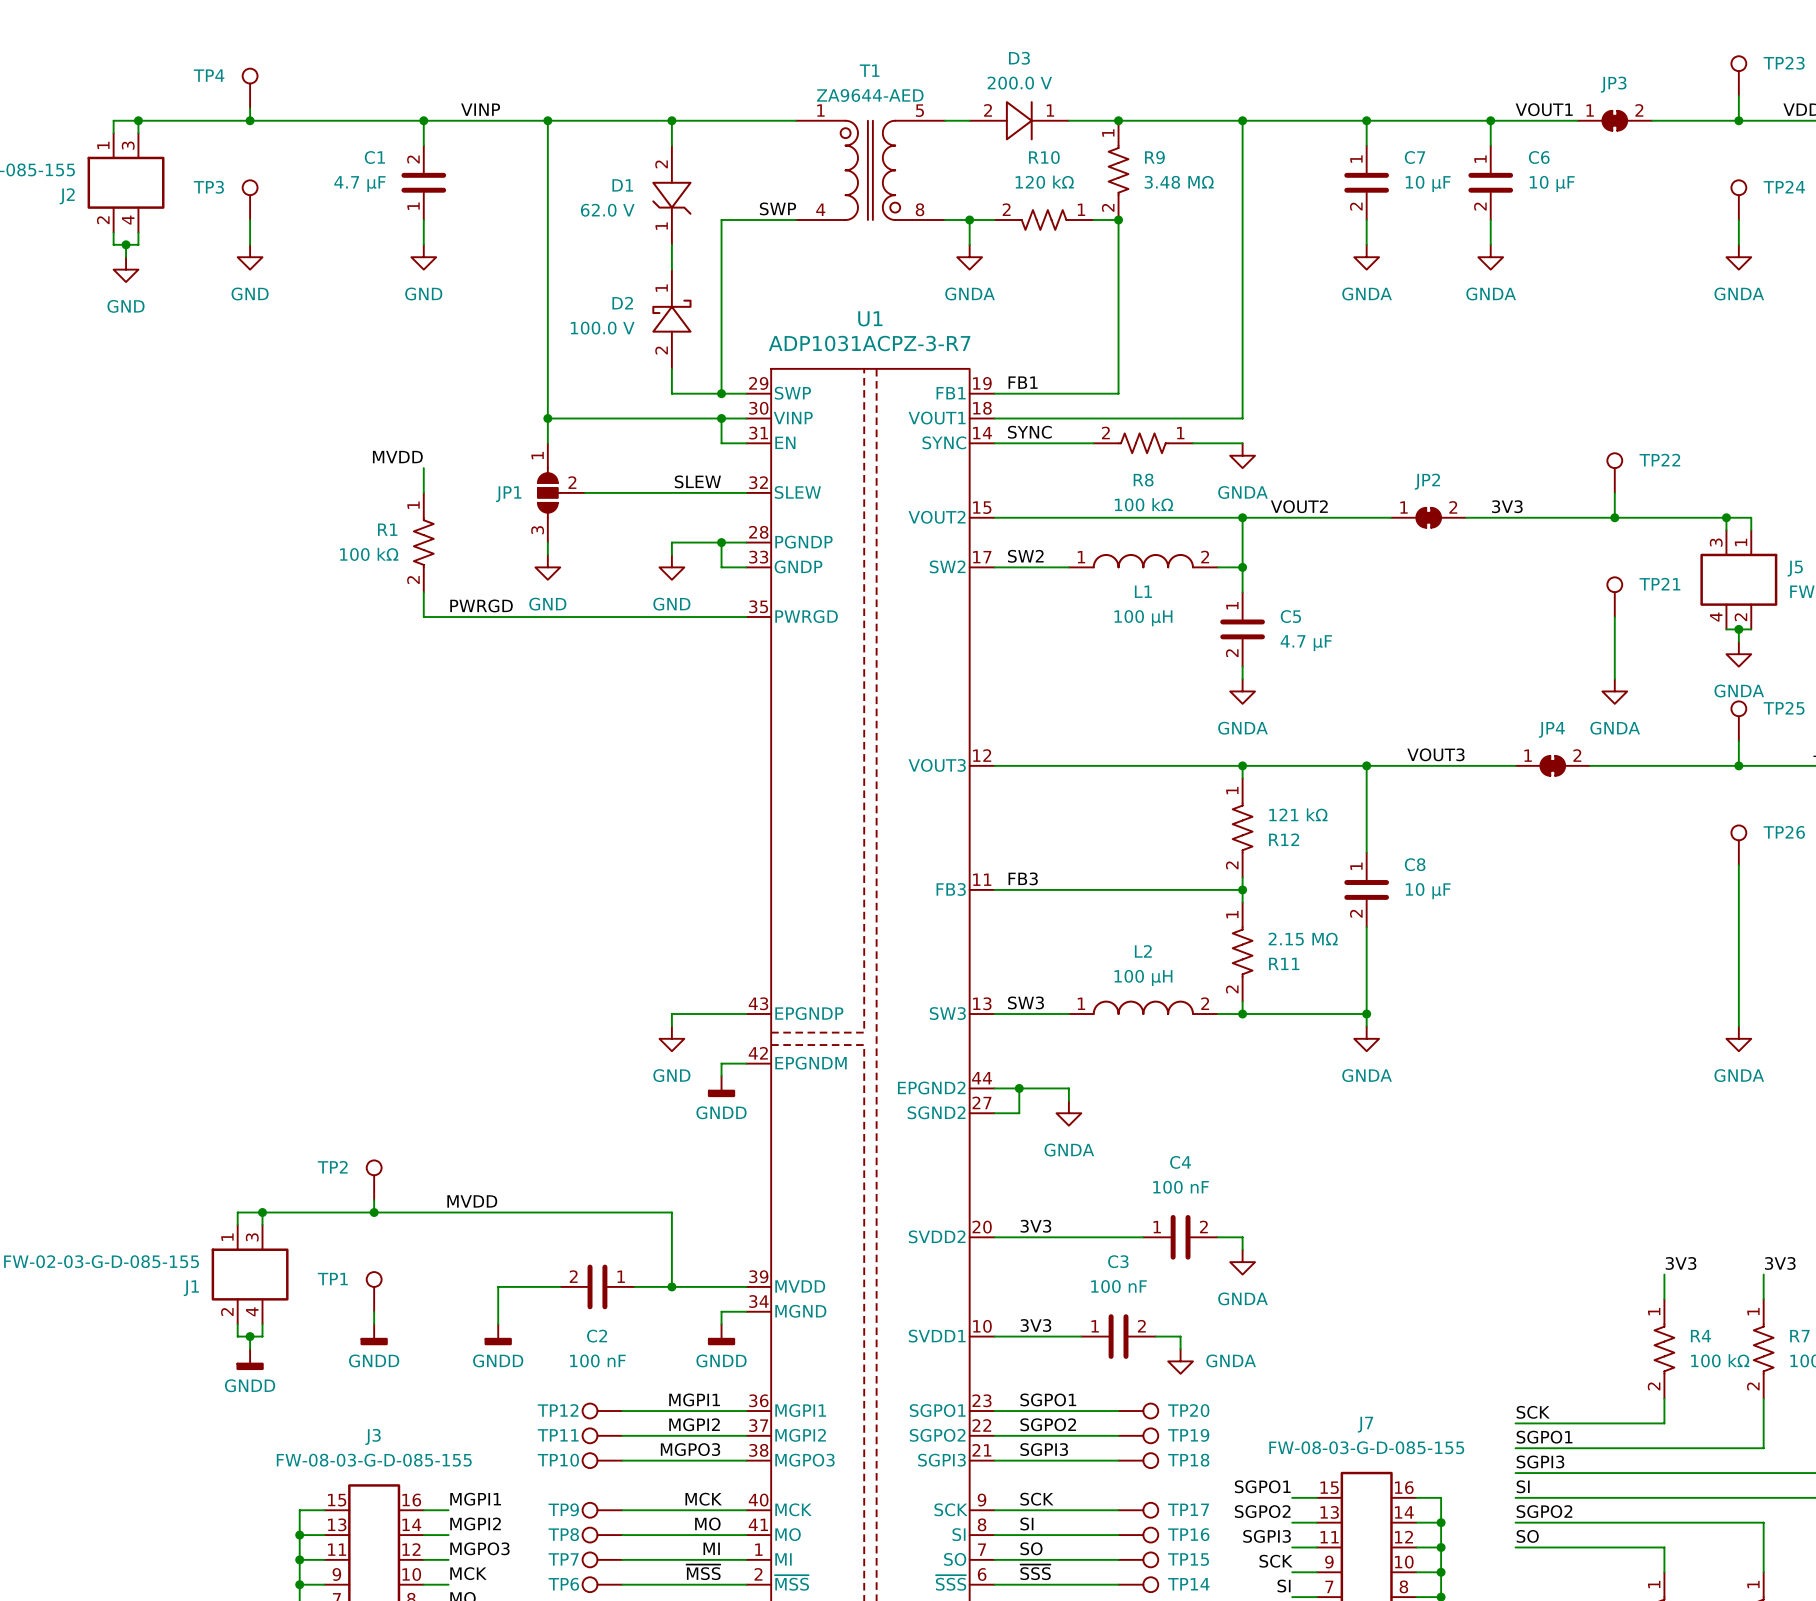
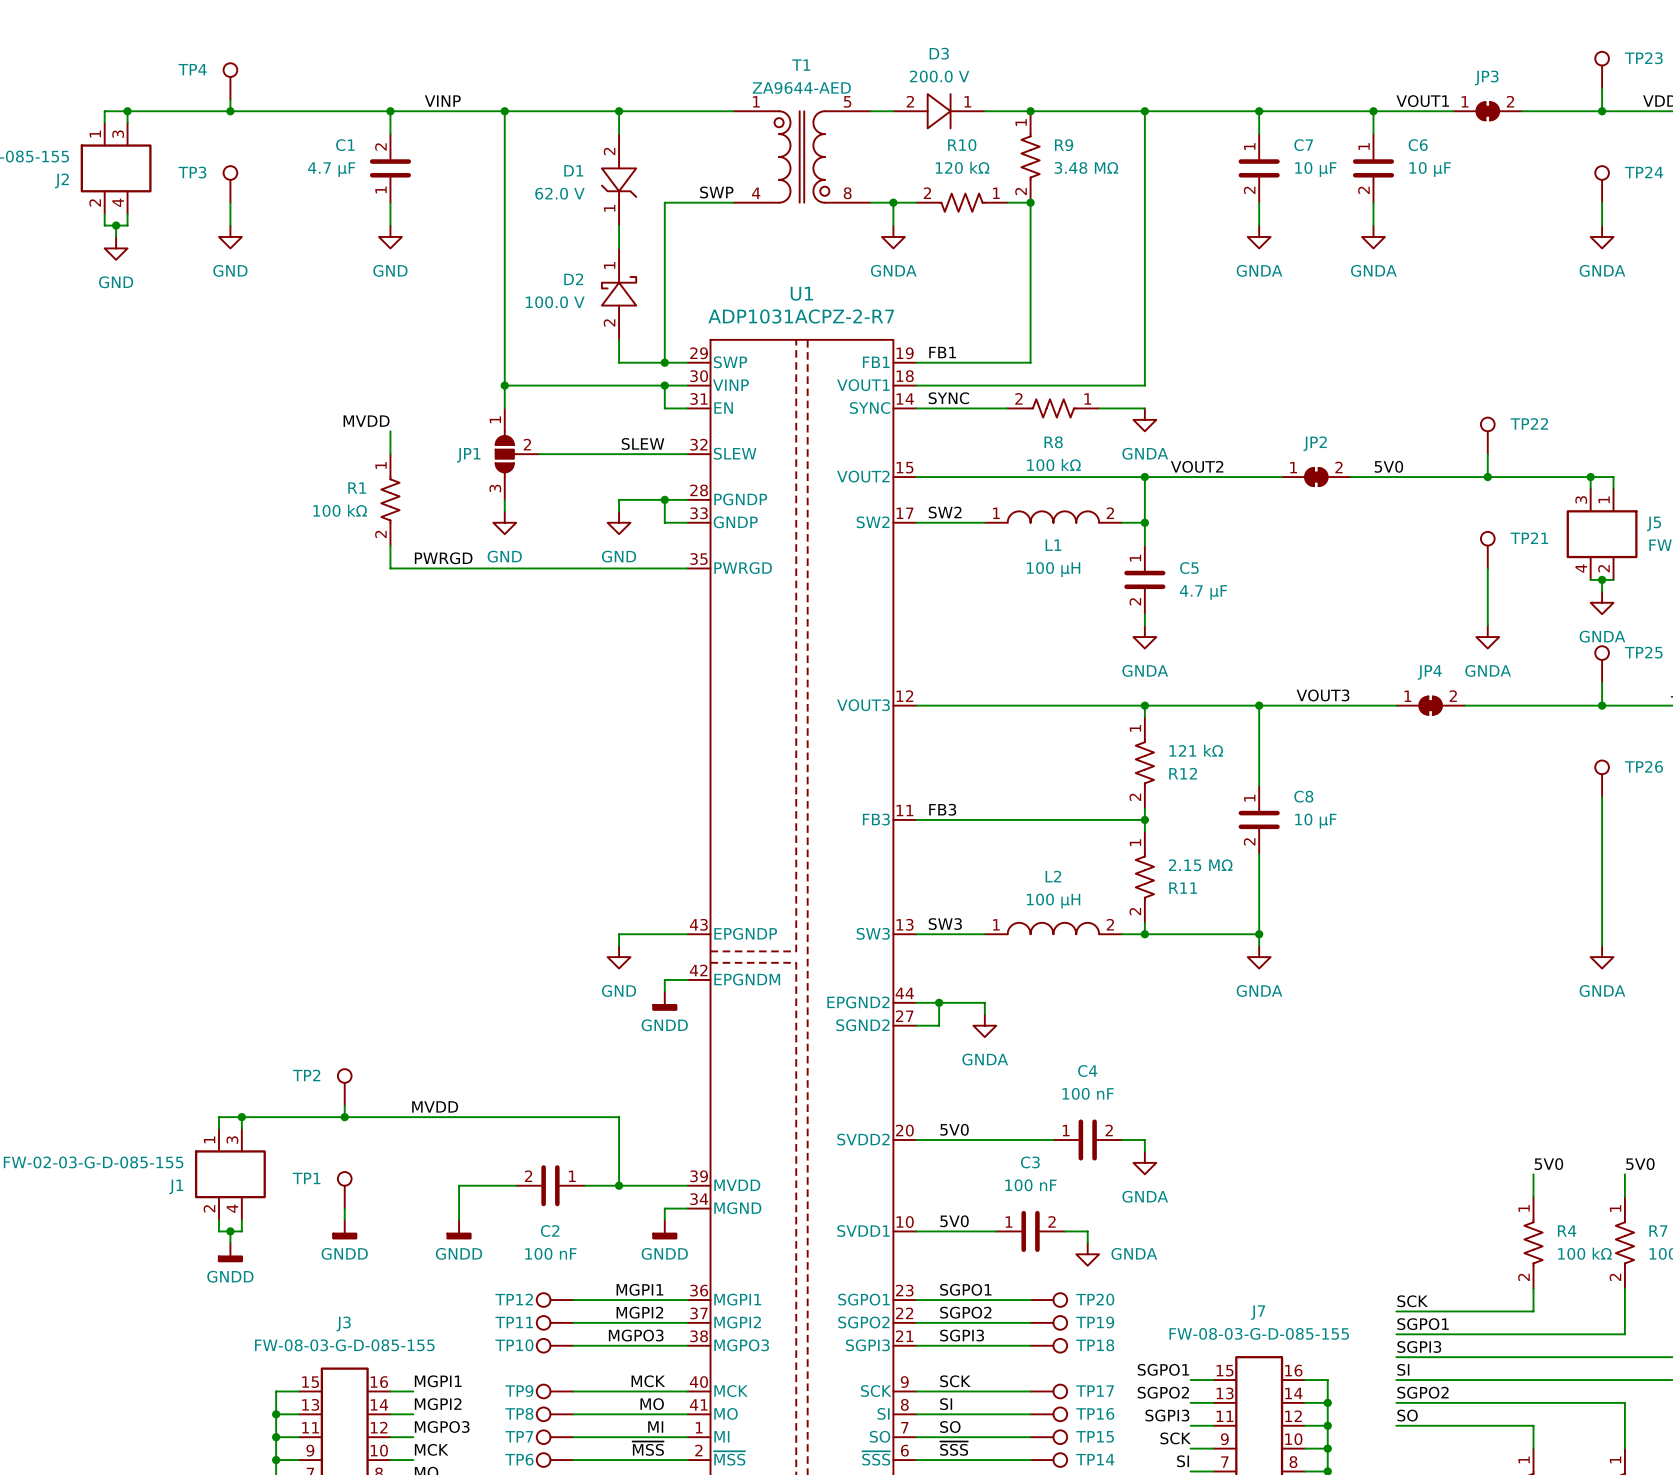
U1 value: ADP1031ACPZ-3-R7 (869, 343) -> ADP1031ACPZ-2-R7 (801, 316)
label: 3V3 (1507, 506) -> 5V0 (1388, 466)
label: 3V3 (1035, 1226) -> 5V0 (954, 1129)
label: 3V3 (1681, 1263) -> 5V0 (1548, 1164)
label: 3V3 (1780, 1263) -> 5V0 (1640, 1164)
label: 3V3 (1035, 1325) -> 5V0 (954, 1221)

